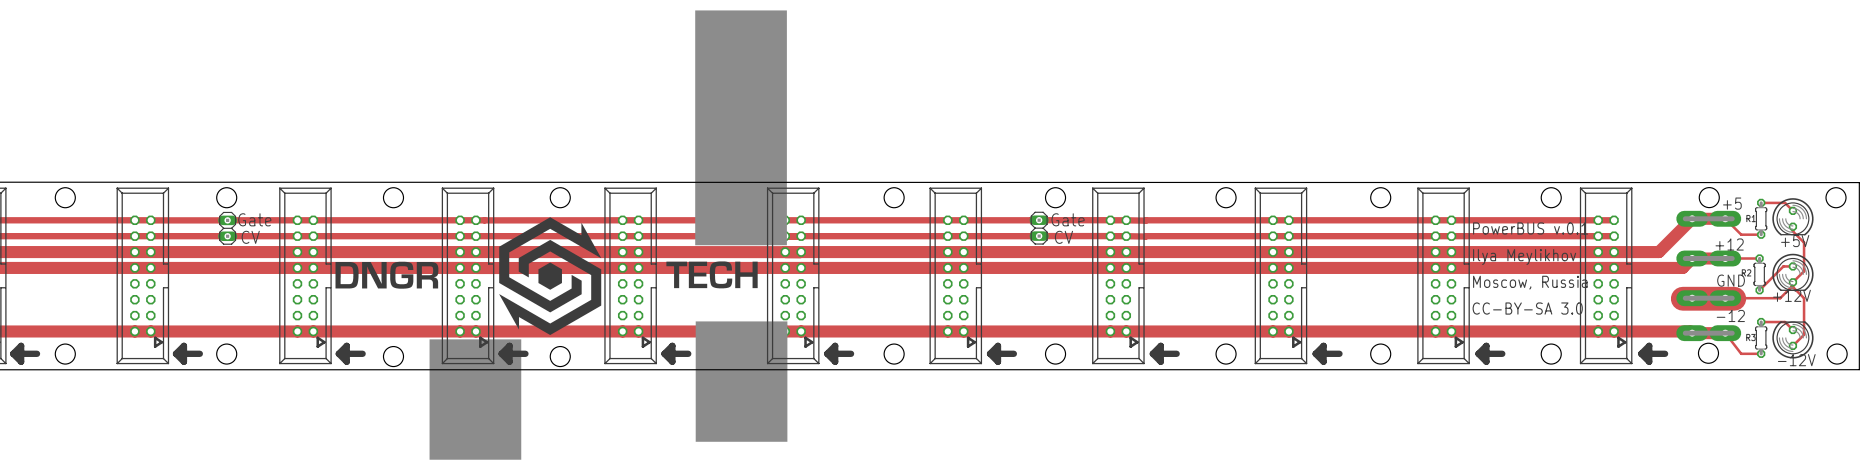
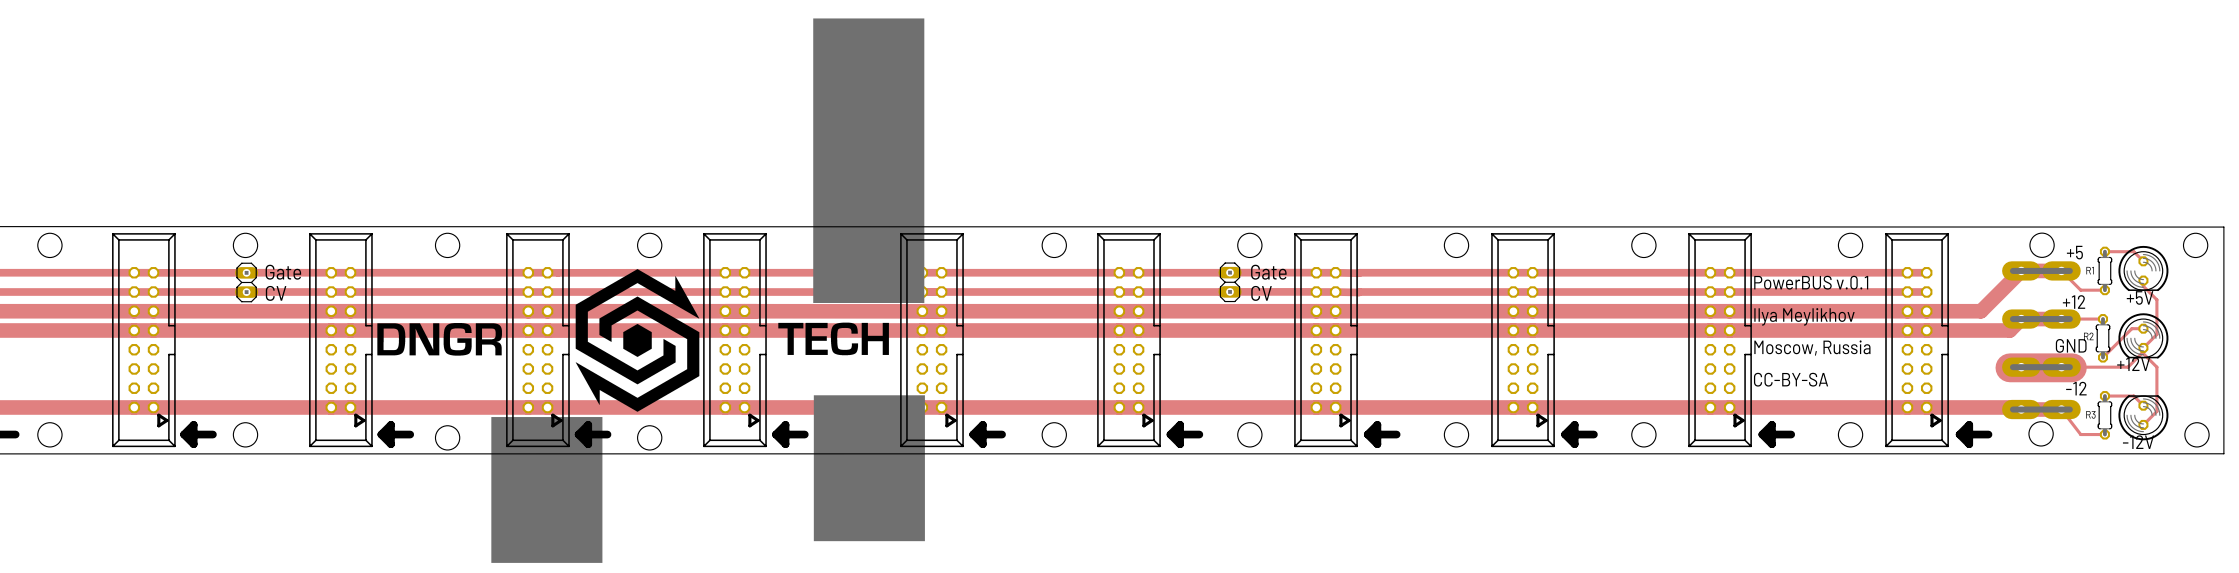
text: CC-BY-SA 3.0 (1527, 308) -> CC-BY-SA (1791, 379)

